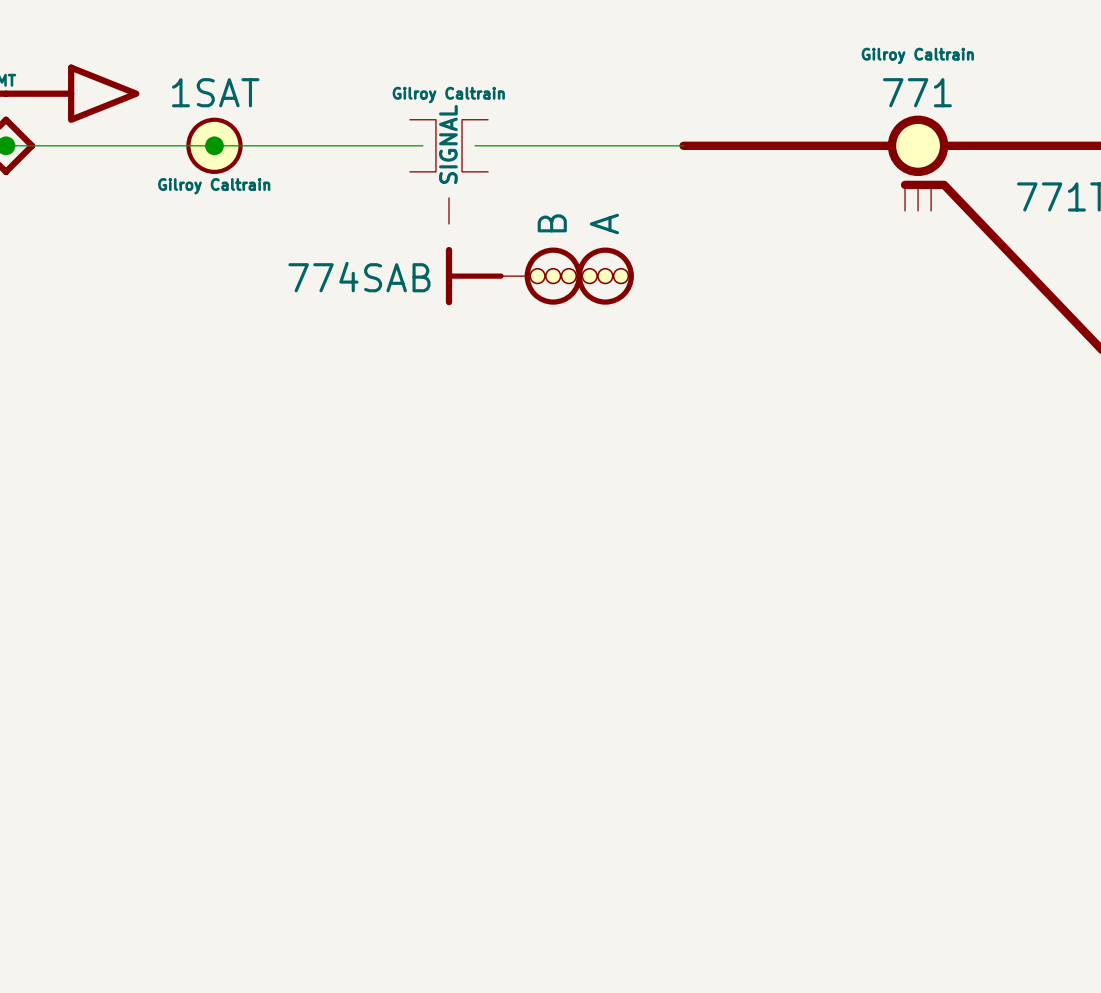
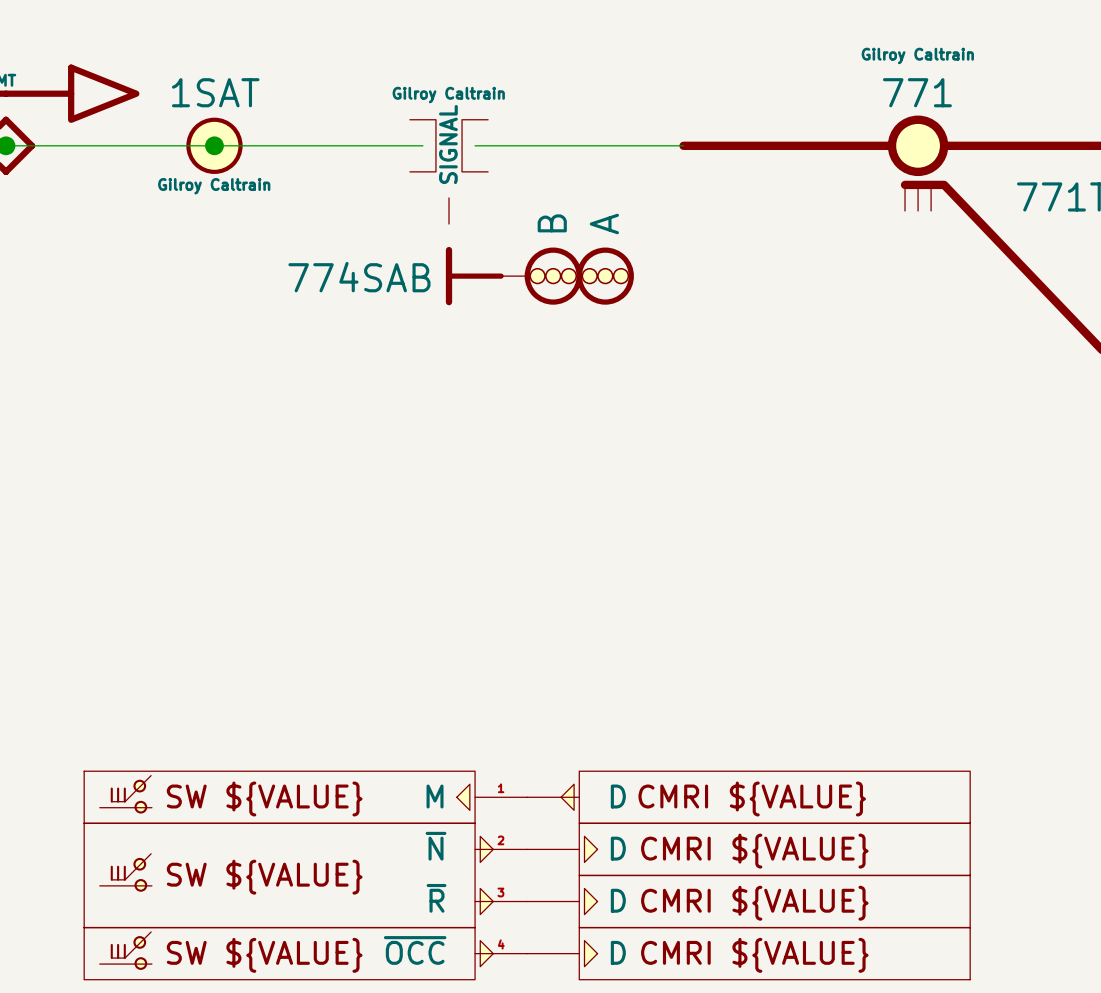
part: none -> (305, 797)
part: none -> (748, 797)
part: none -> (748, 849)
part: none -> (305, 875)
part: none -> (748, 901)
part: none -> (305, 953)
part: none -> (748, 953)

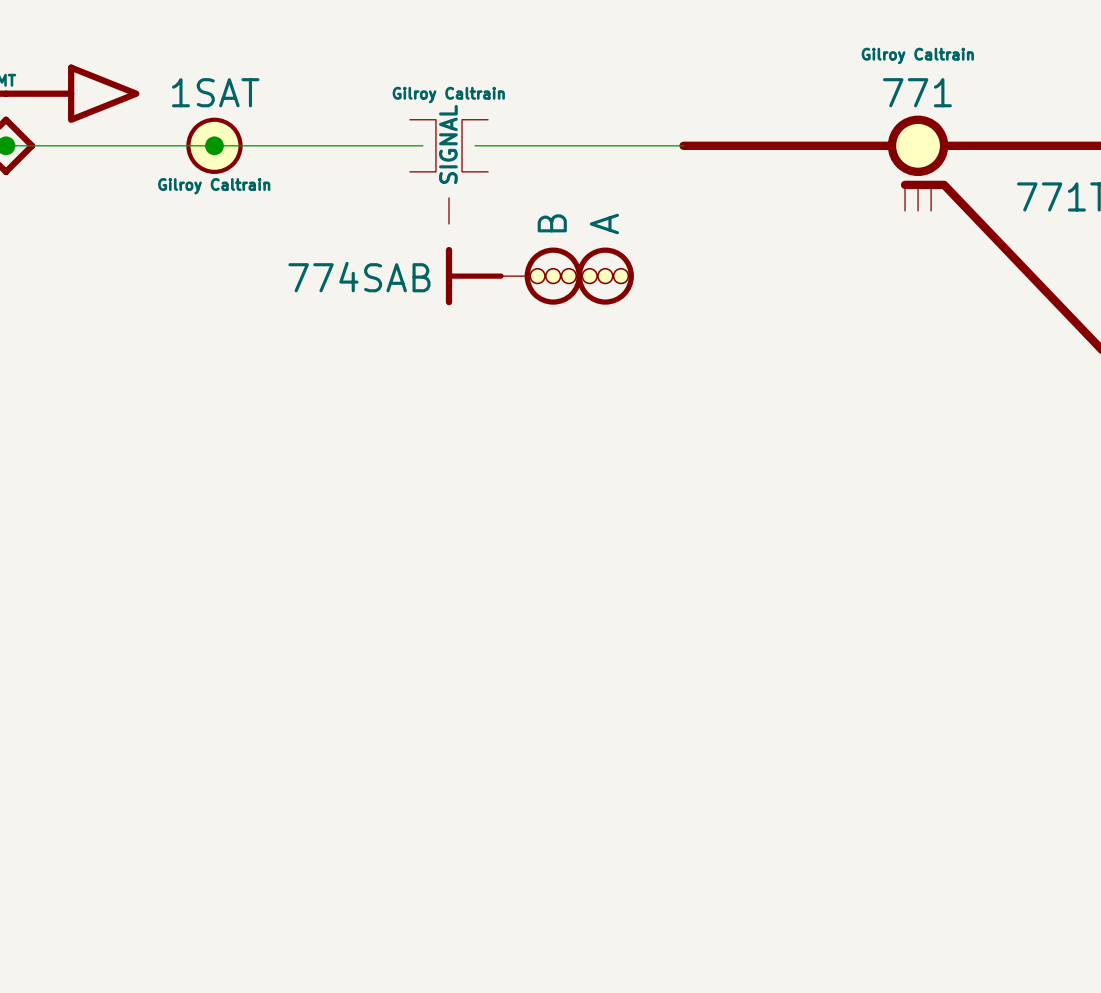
part: (305, 797) -> none
part: (748, 797) -> none
part: (748, 849) -> none
part: (305, 875) -> none
part: (748, 901) -> none
part: (305, 953) -> none
part: (748, 953) -> none

